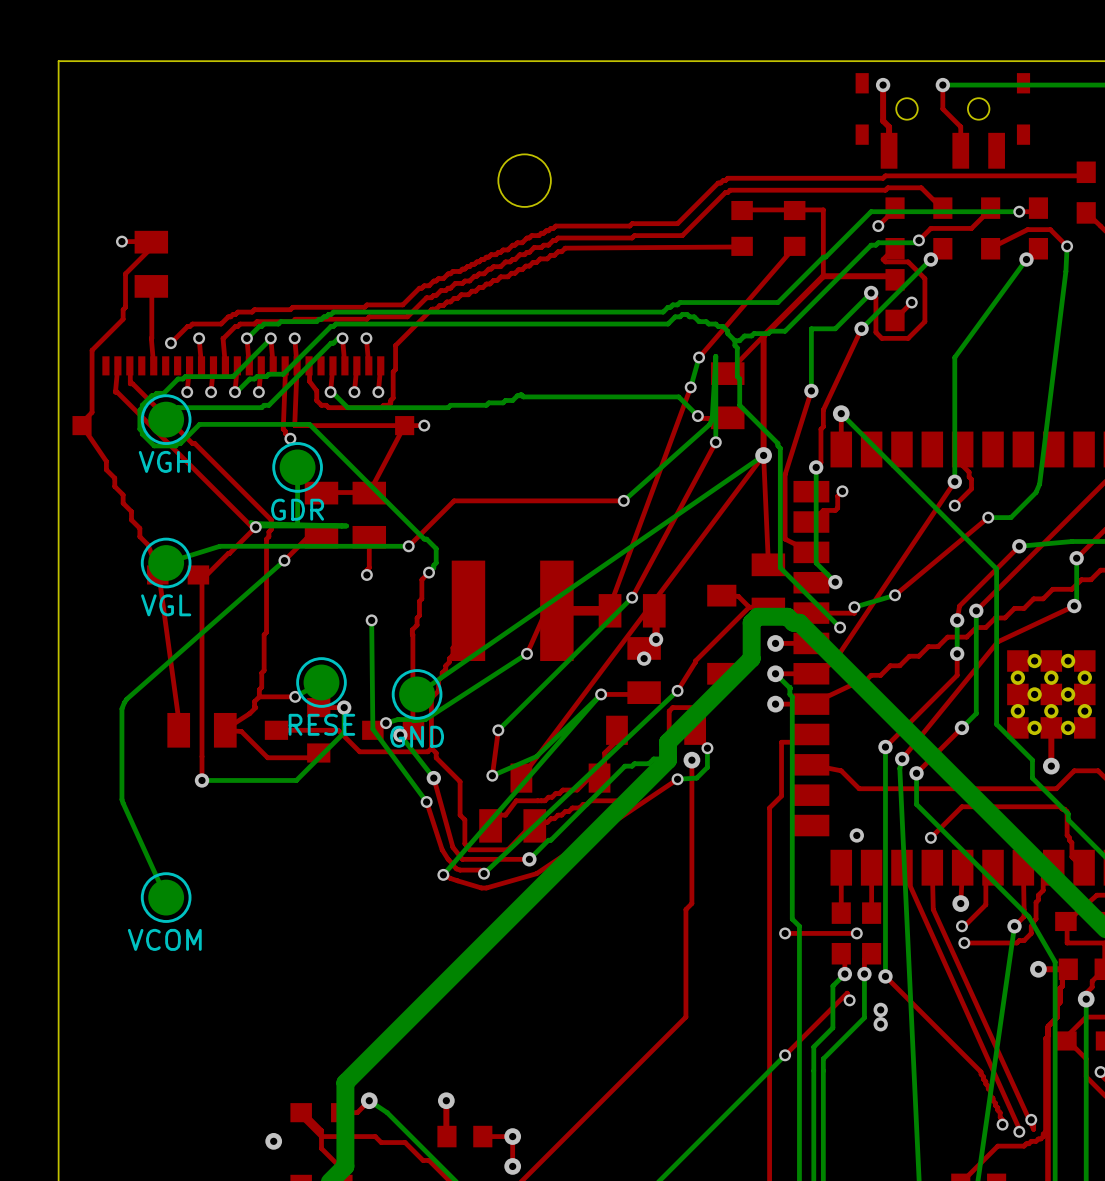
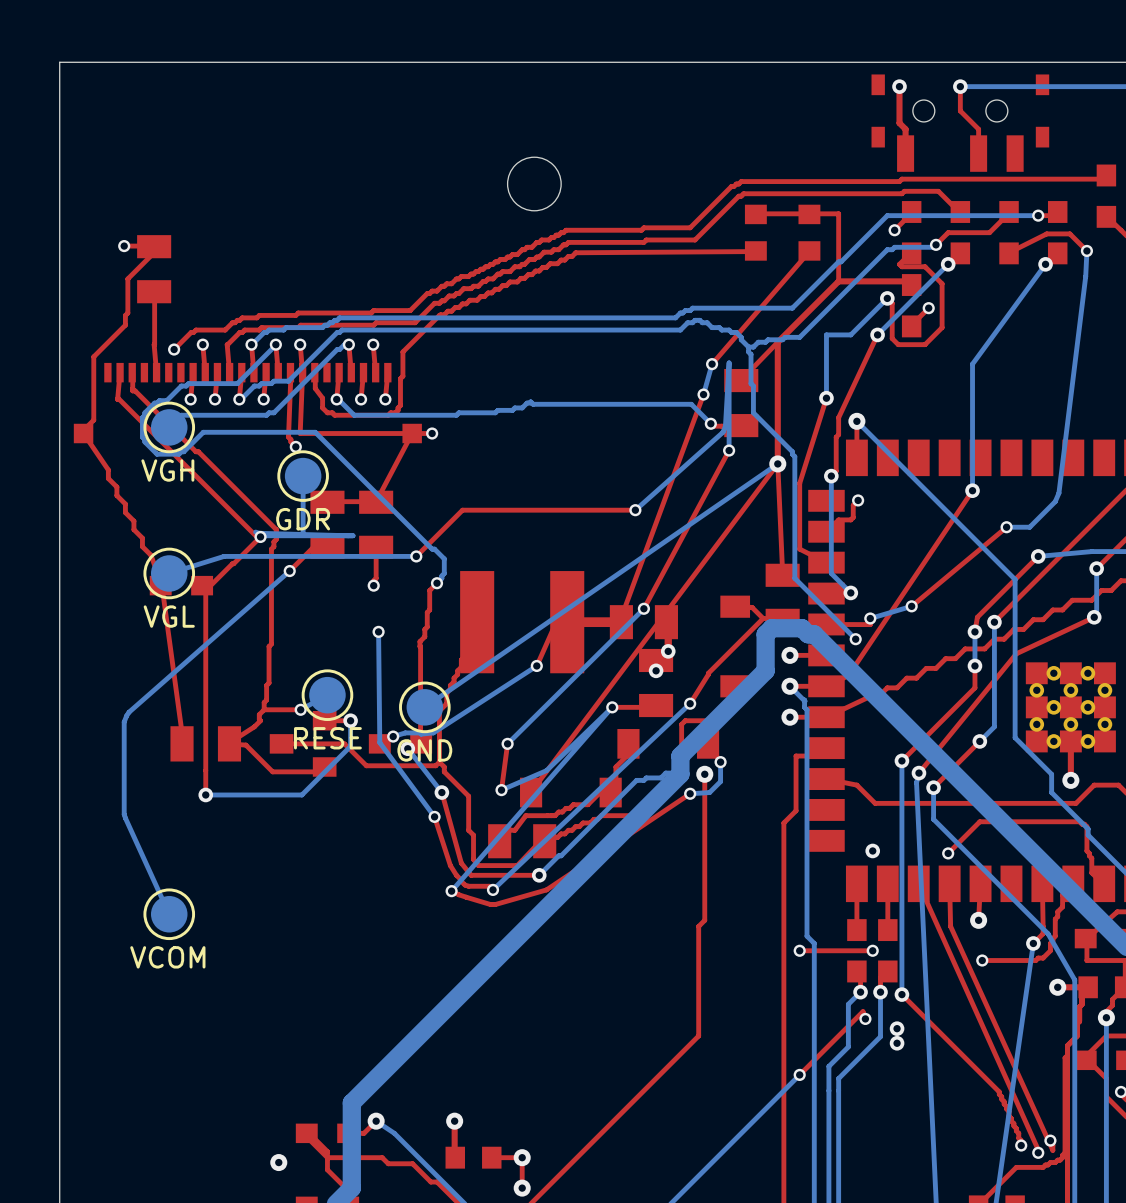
top track: (962, 449) (961, 465) (969, 472) (971, 488) (954, 505) -> none
via: (954, 505) -> none
top track: (993, 867) (985, 876) (985, 904) (964, 926) (961, 926) -> none
via: (961, 926) -> none

